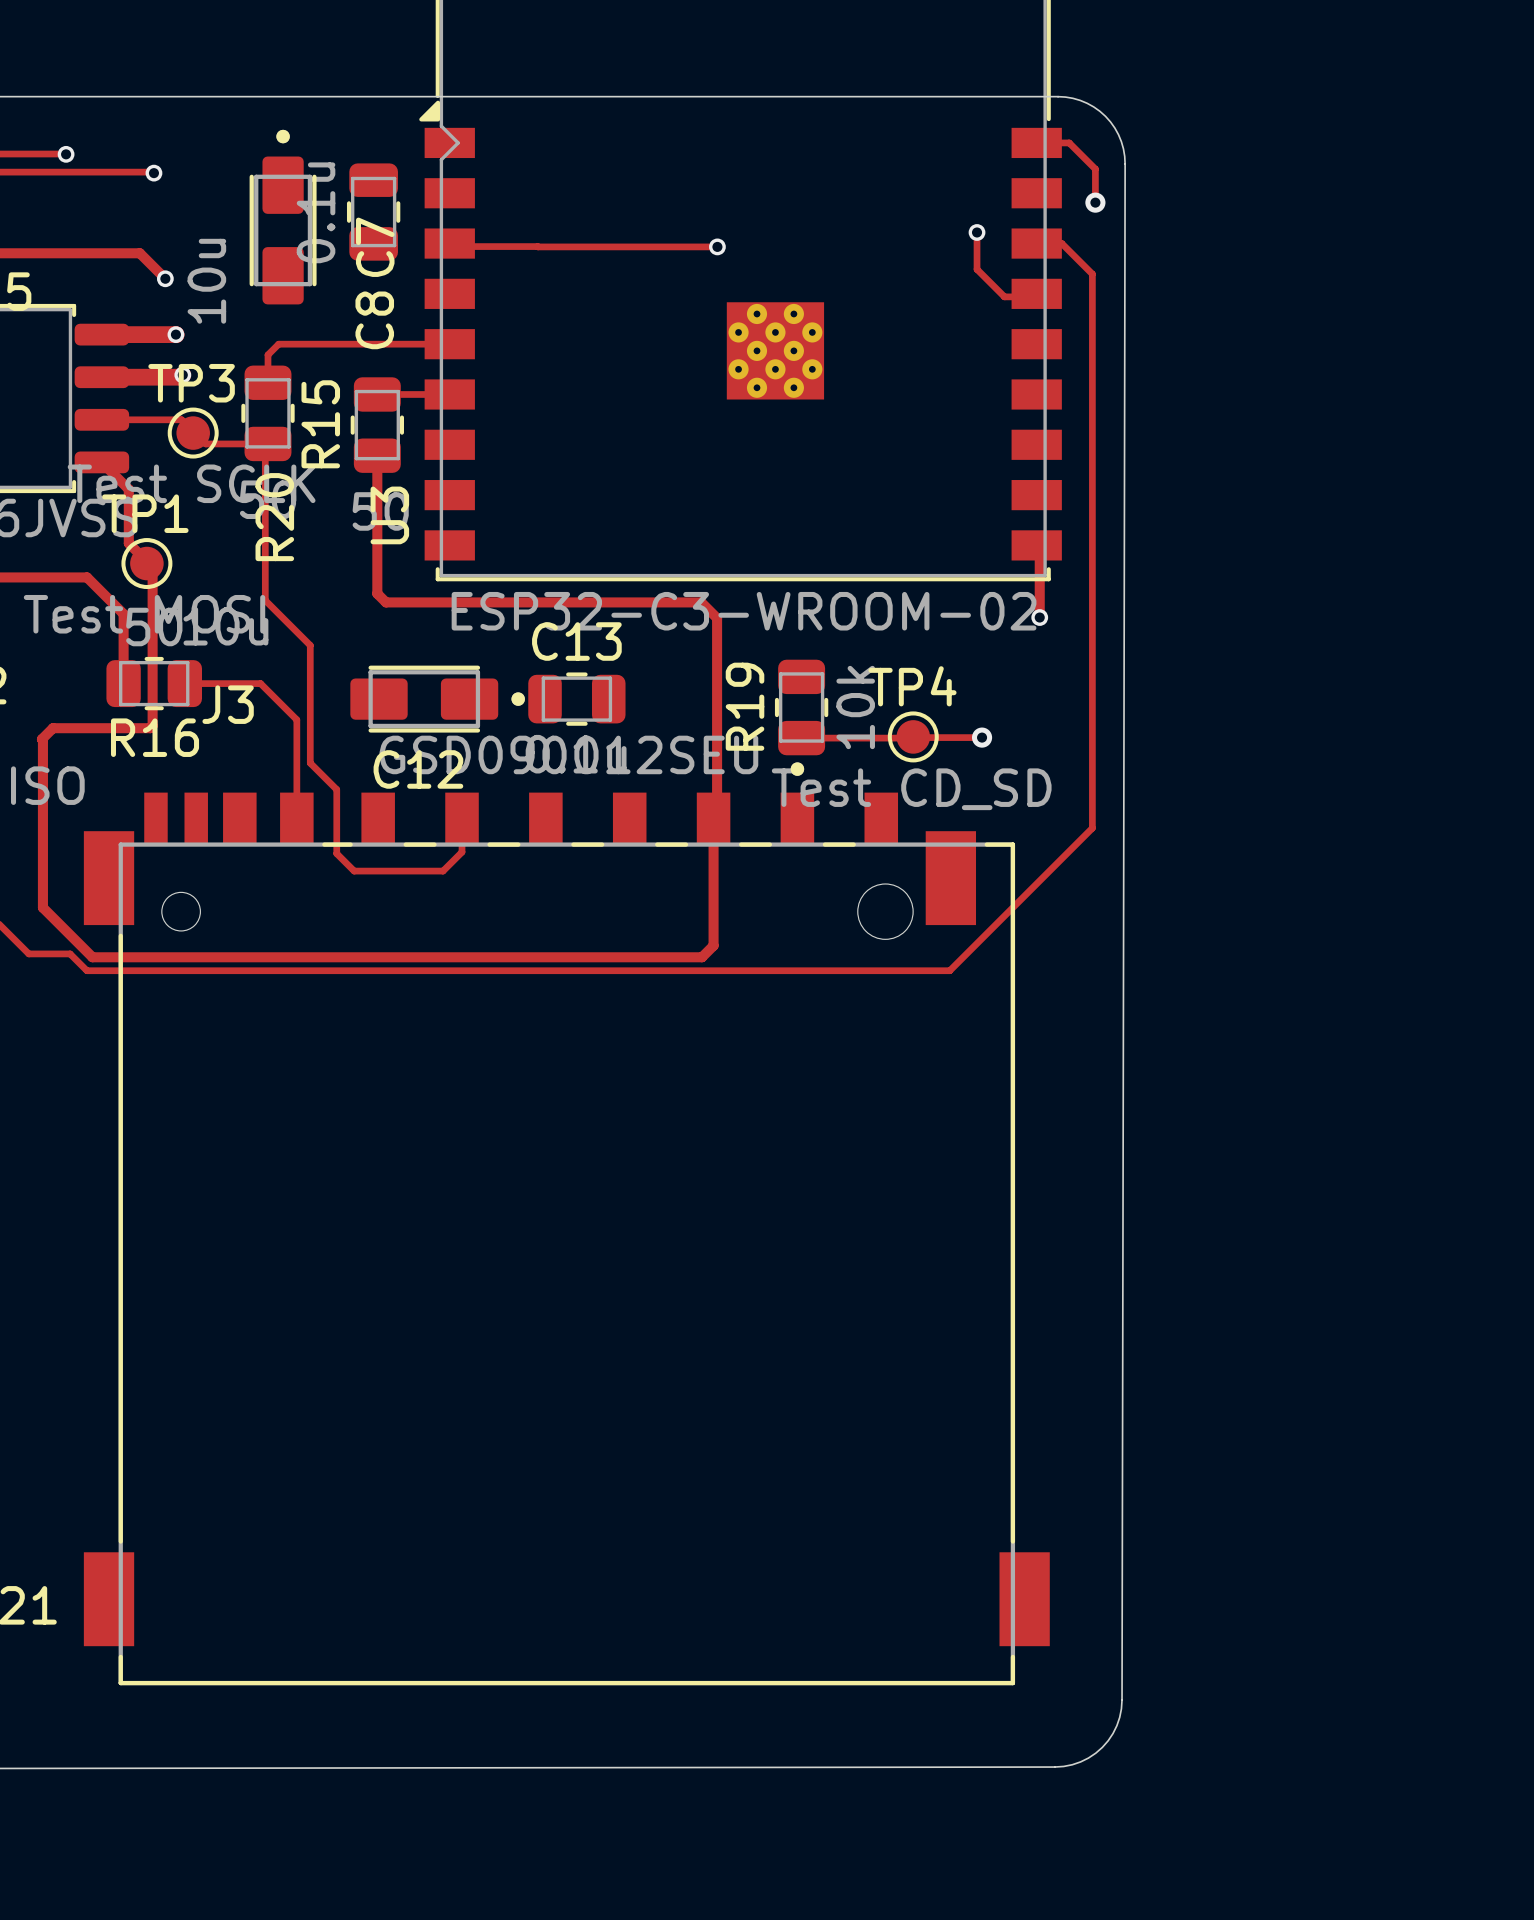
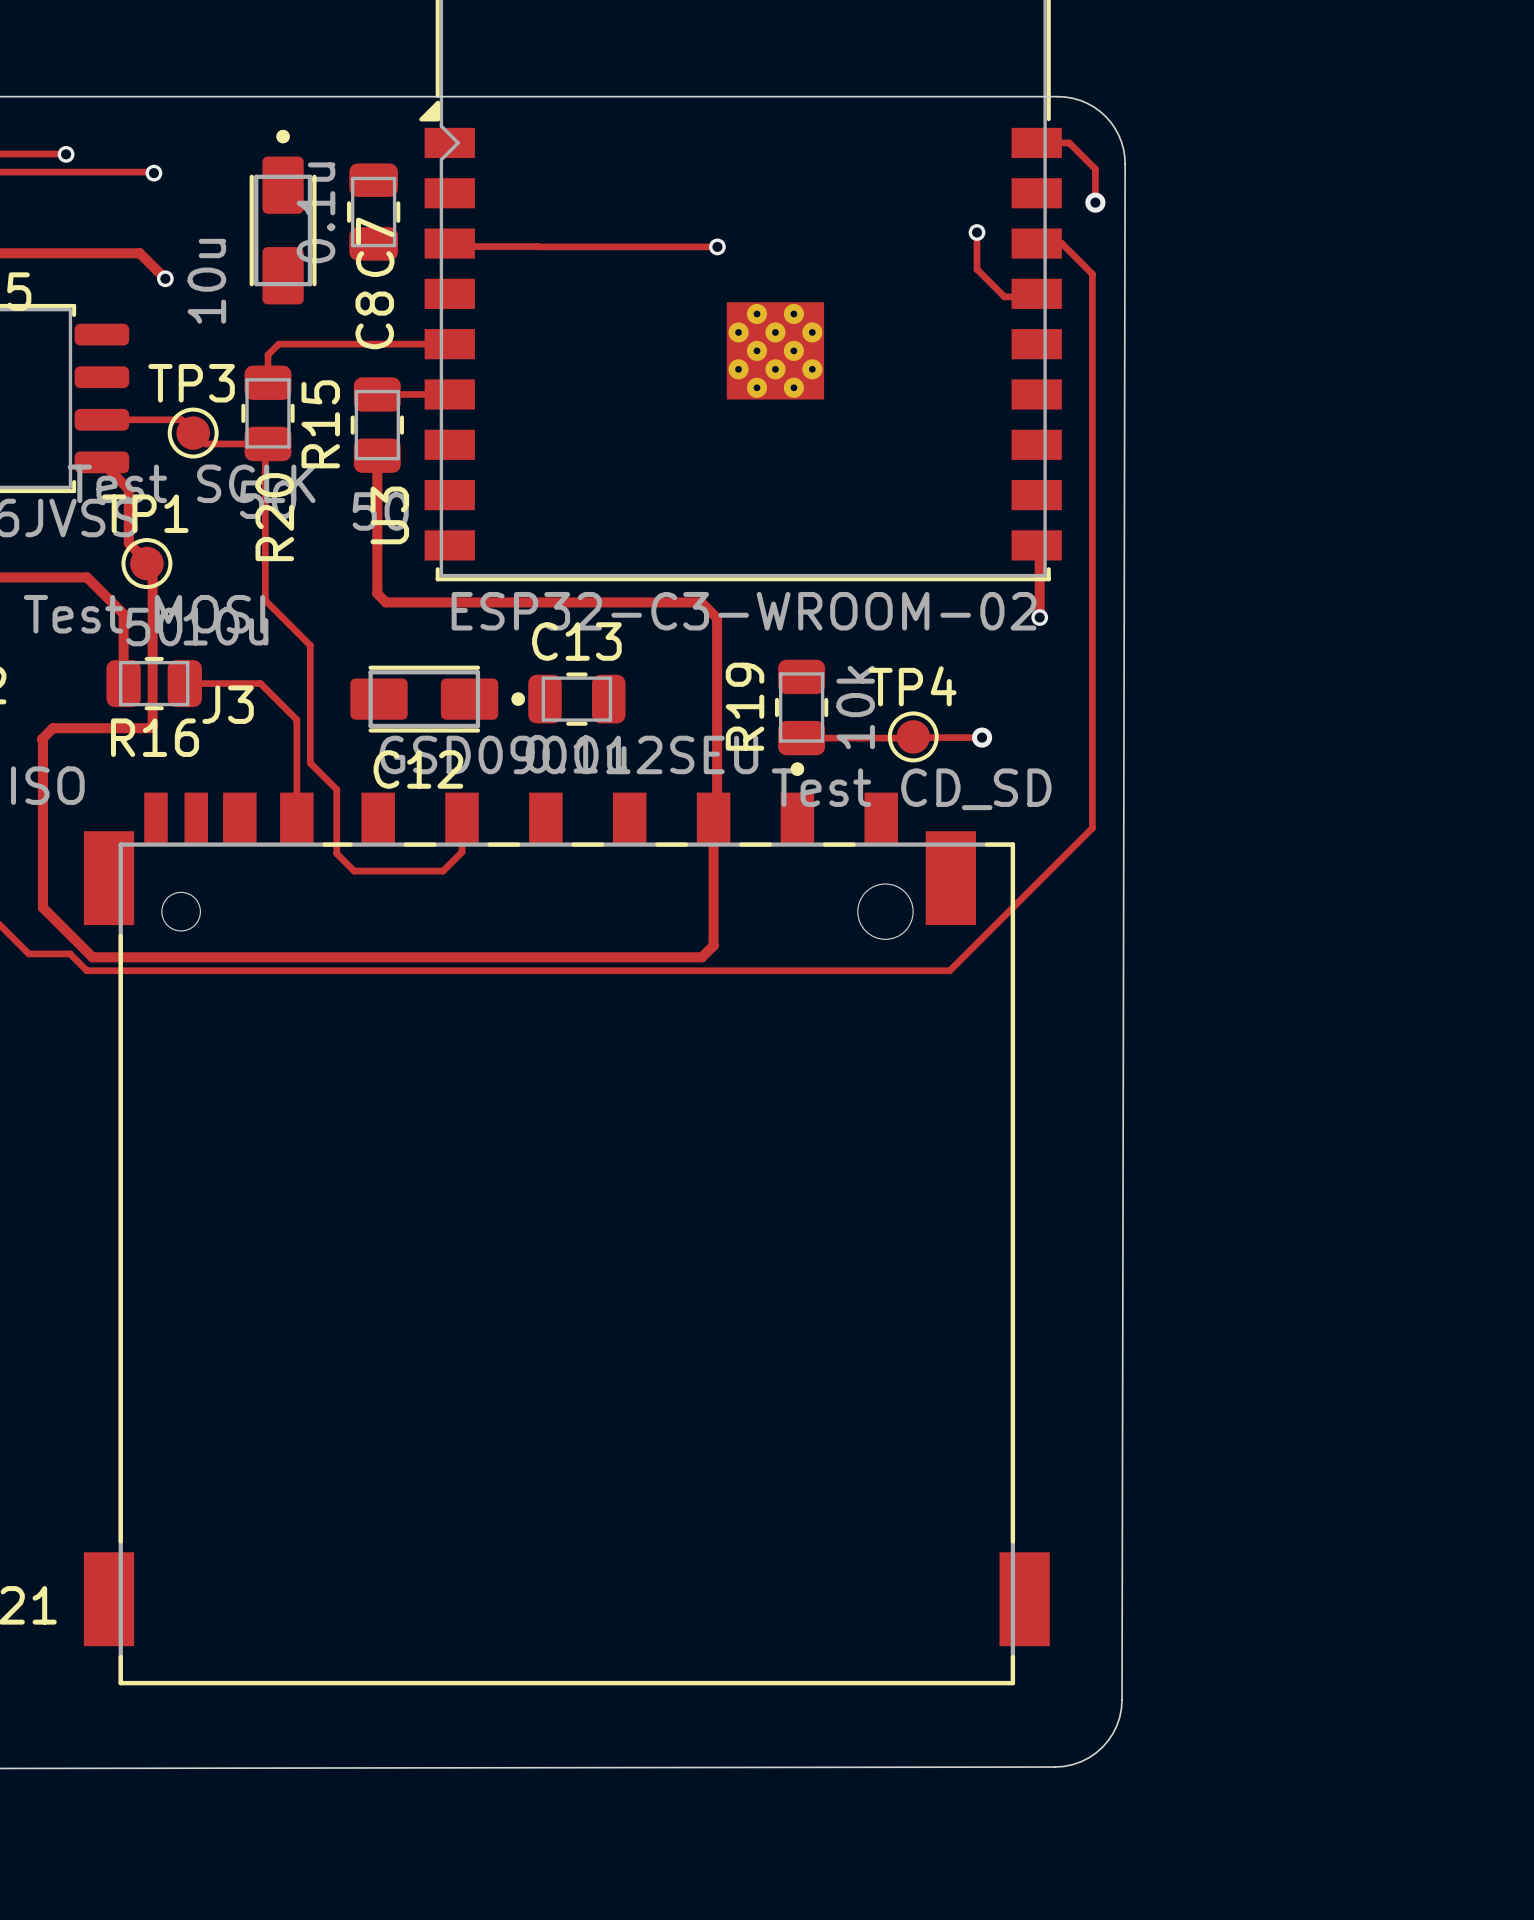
track: (101, 334) (175, 334) -> none
via: (175, 334) -> none
track: (182, 375) (180, 377) (101, 377) -> none
via: (182, 375) -> none

